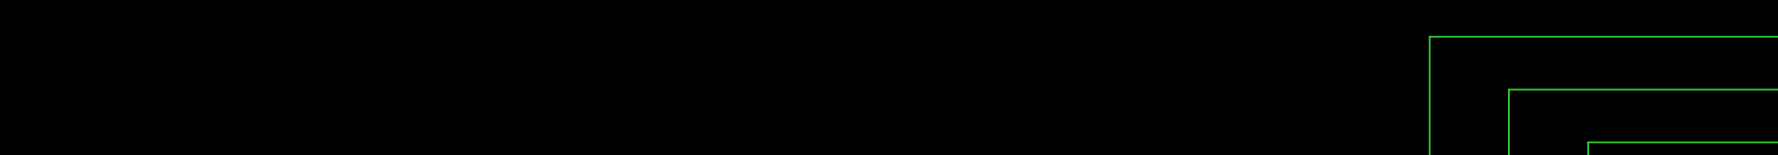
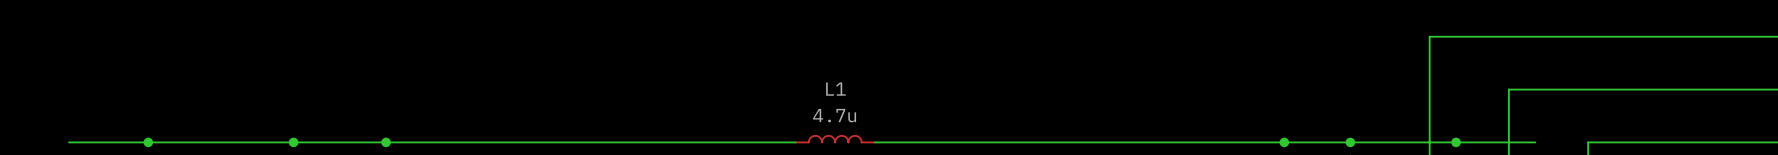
L1: none -> 4.7u (835, 139)
wire: none -> (69, 142) (795, 142)
junction: none -> (148, 142)
junction: none -> (293, 142)
junction: none -> (386, 142)
wire: none -> (874, 142) (1535, 142)
junction: none -> (1284, 142)
junction: none -> (1350, 142)
junction: none -> (1456, 142)

